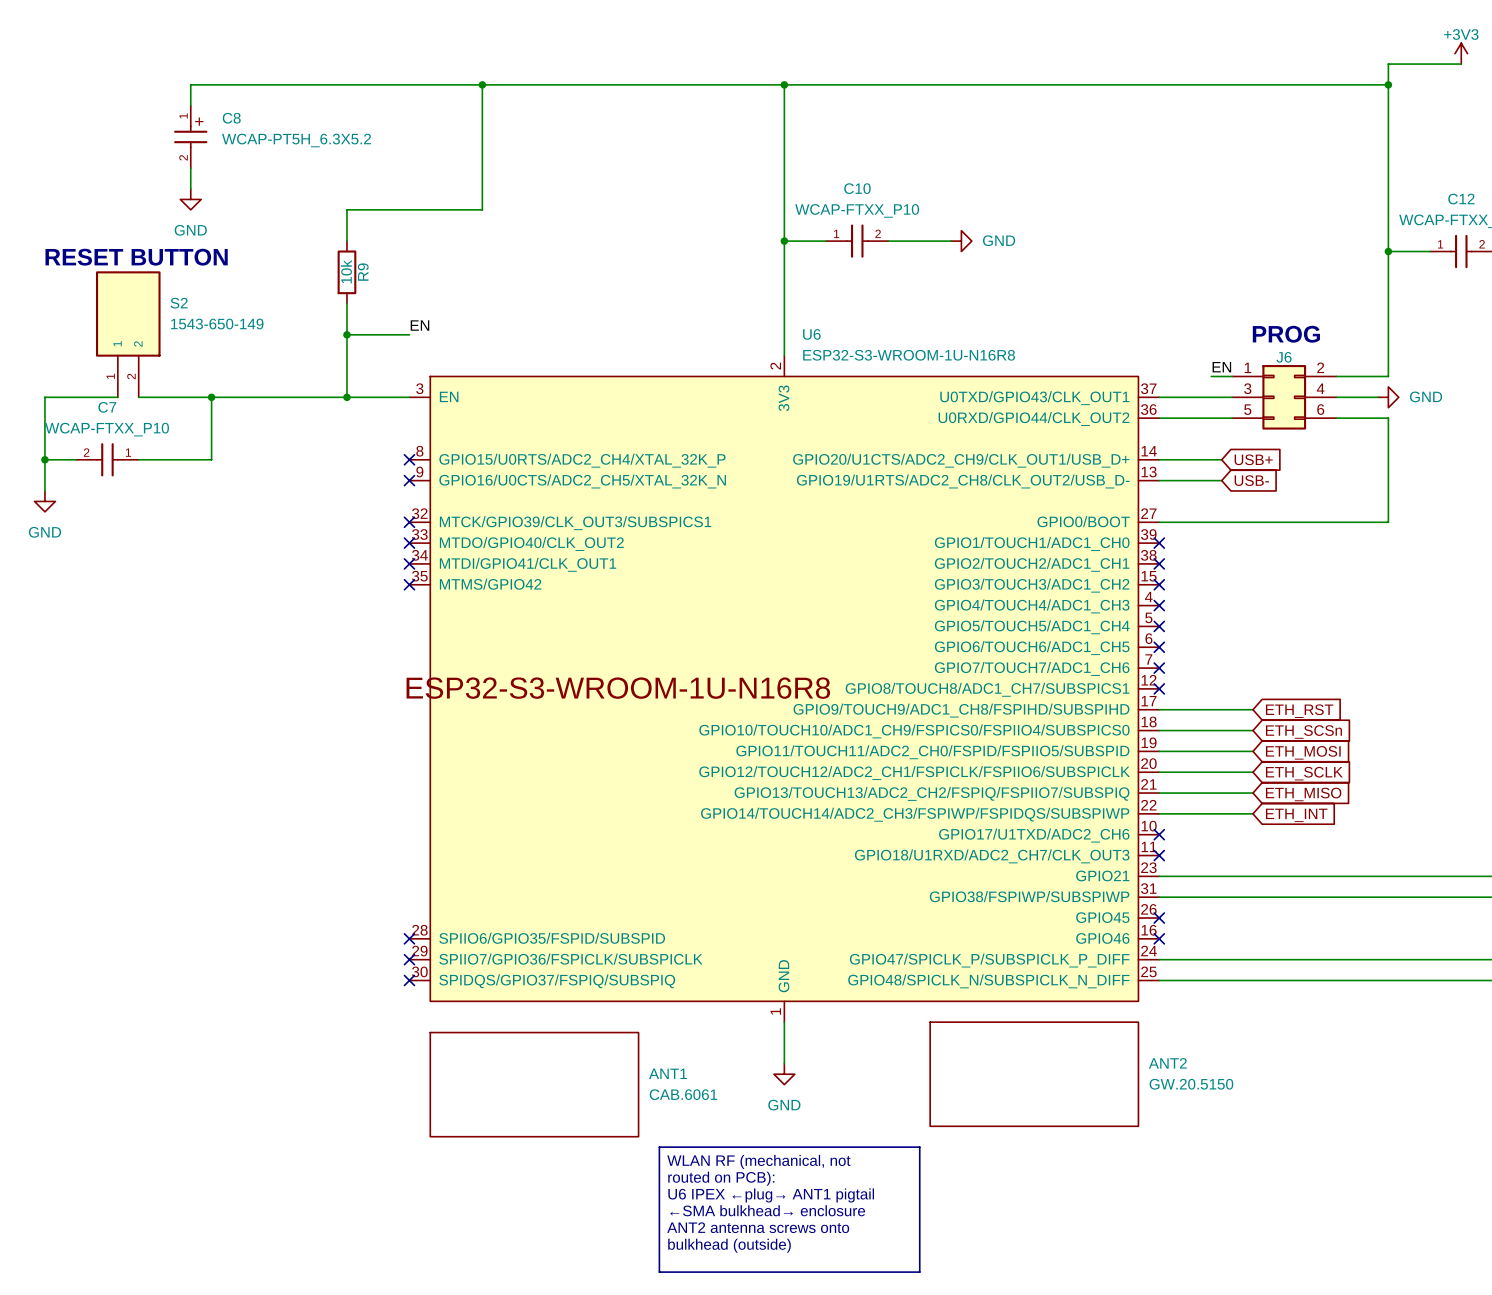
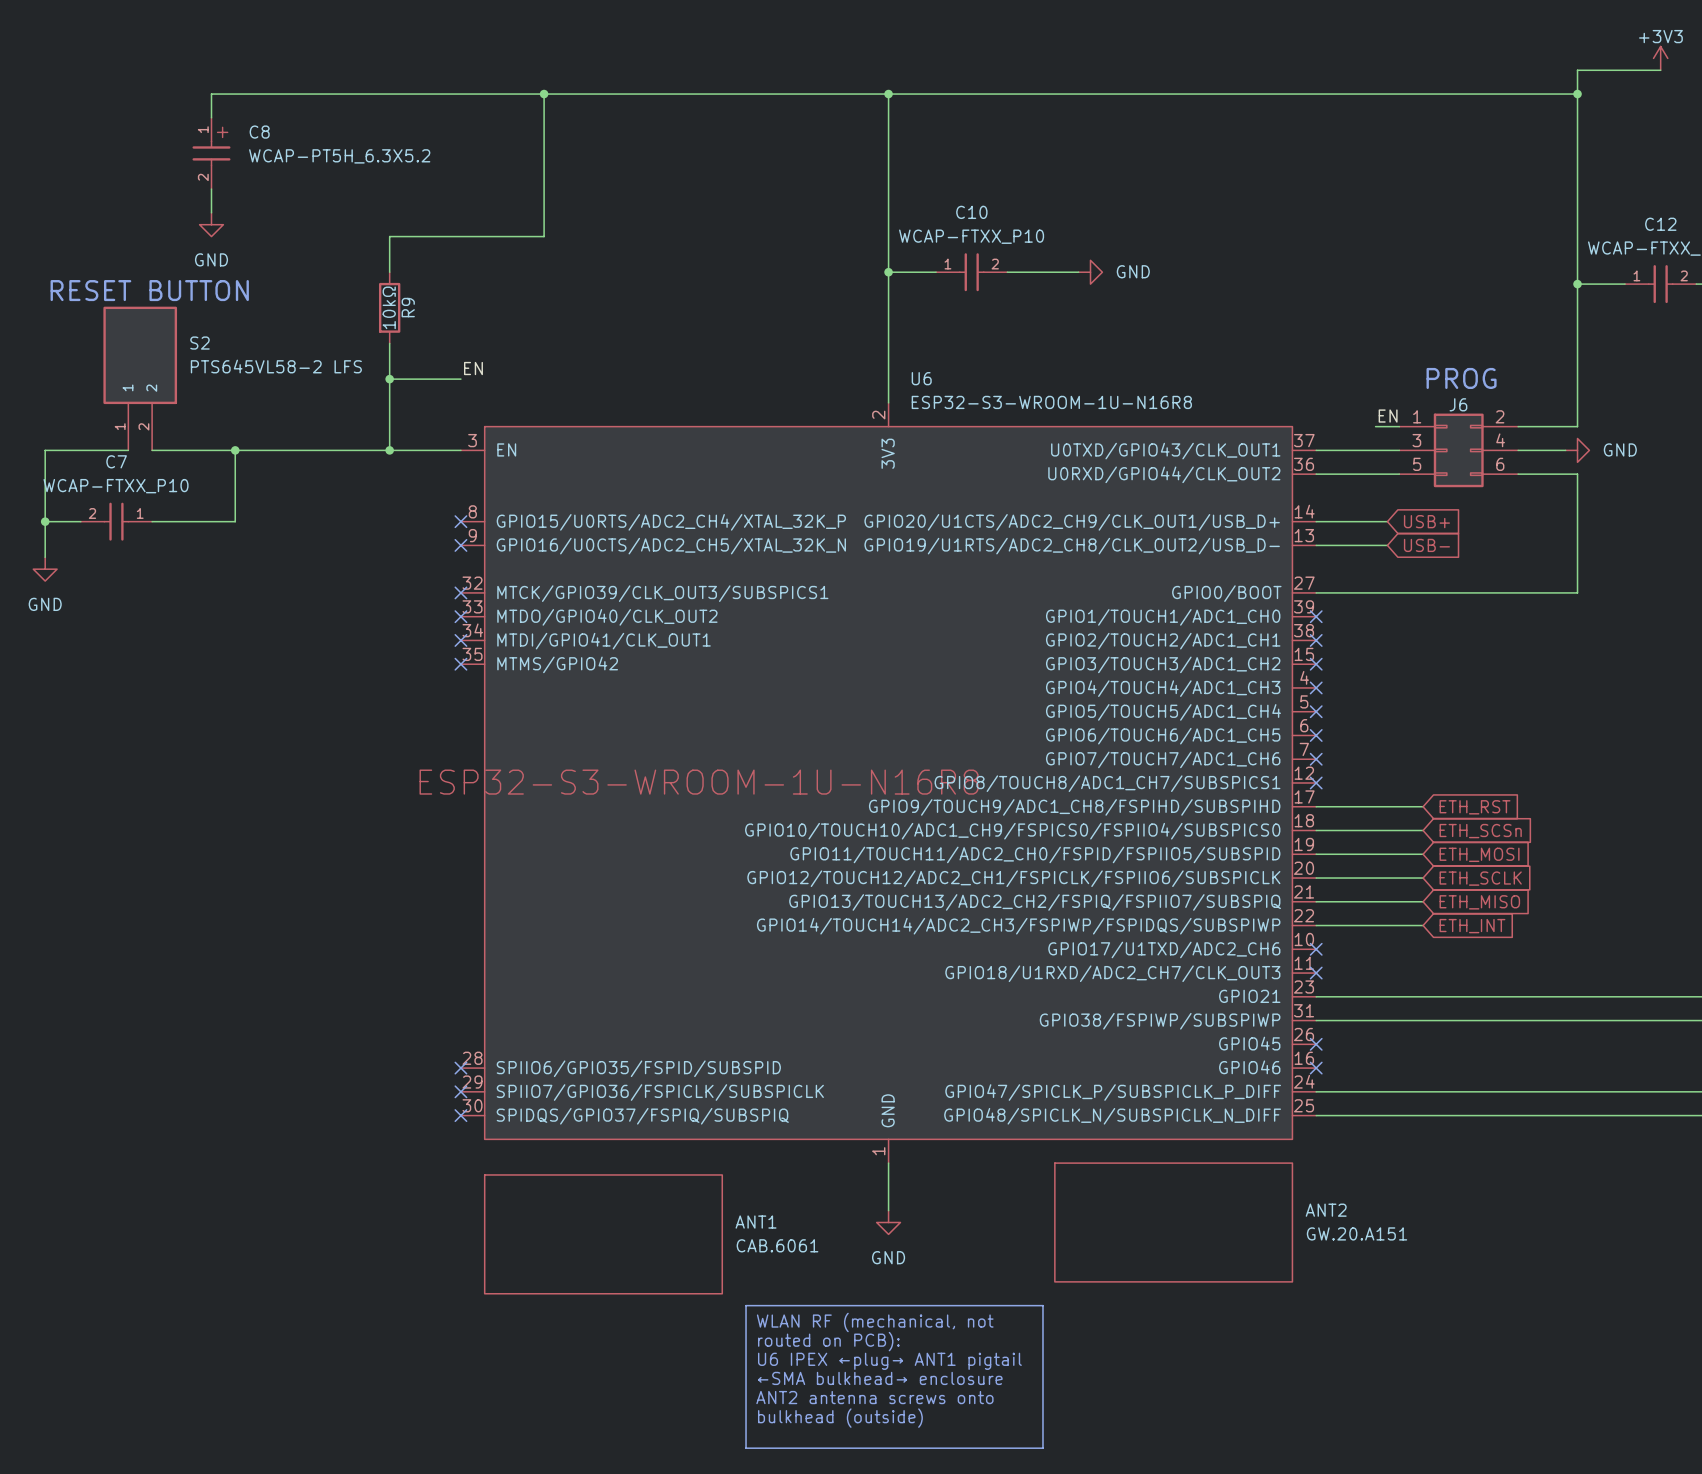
R9 value: 10k (346, 271) -> 10kΩ (389, 307)
S2 value: 1543-650-149 (217, 324) -> PTS645VL58-2 LFS (276, 366)
ANT2 value: GW.20.5150 (1191, 1084) -> GW.20.A151 (1357, 1233)

